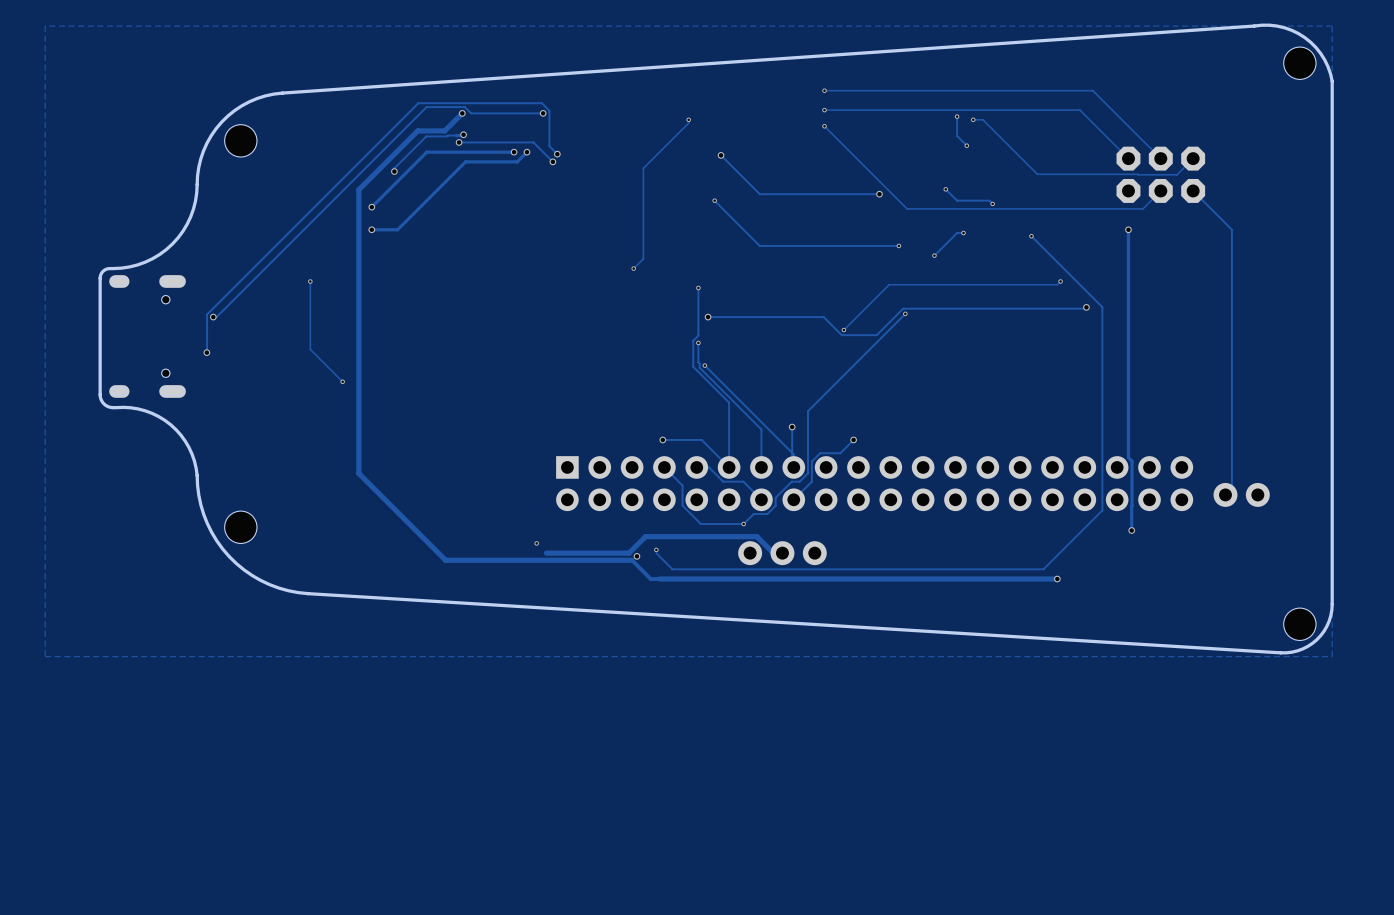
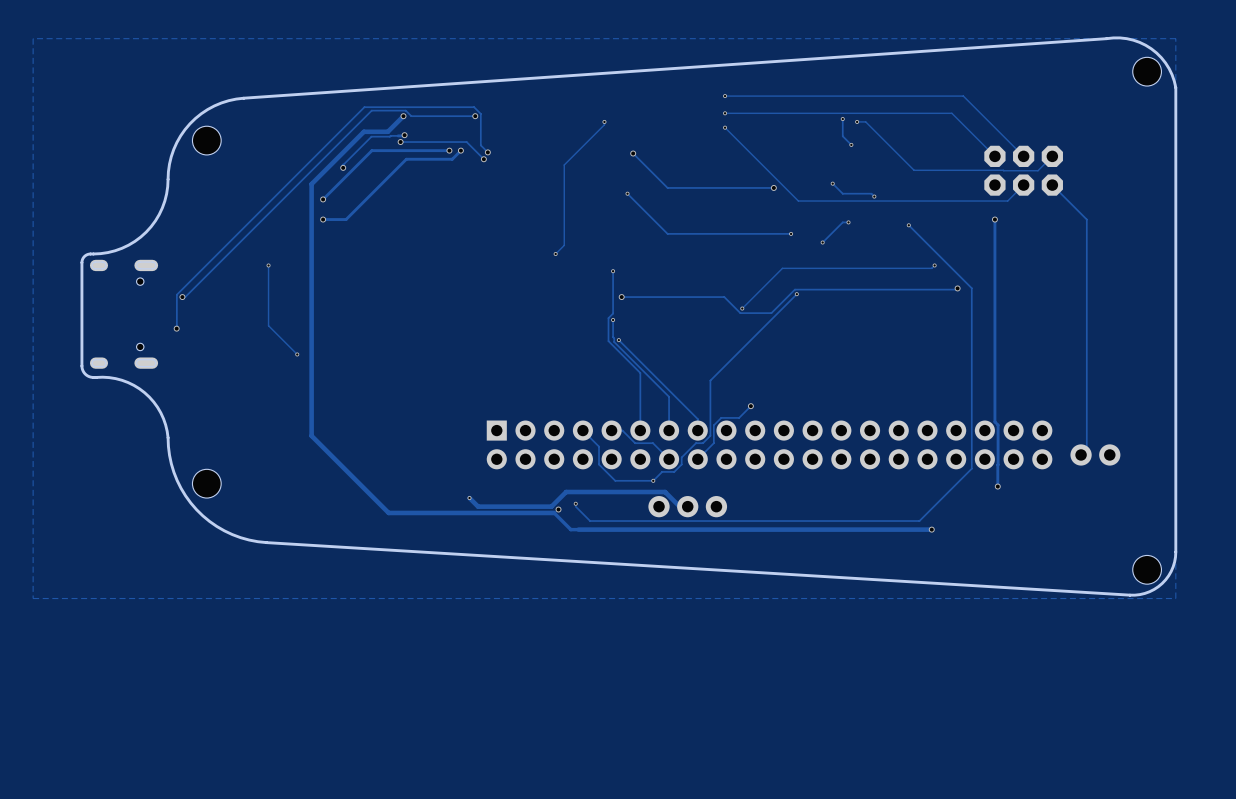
track: (792, 427) (792, 465) (793, 467) -> none
via: (792, 427) -> none
track: (662, 439) (701, 439) (729, 467) -> none
via: (662, 439) -> none
track: none -> (469, 498) (478, 506)

